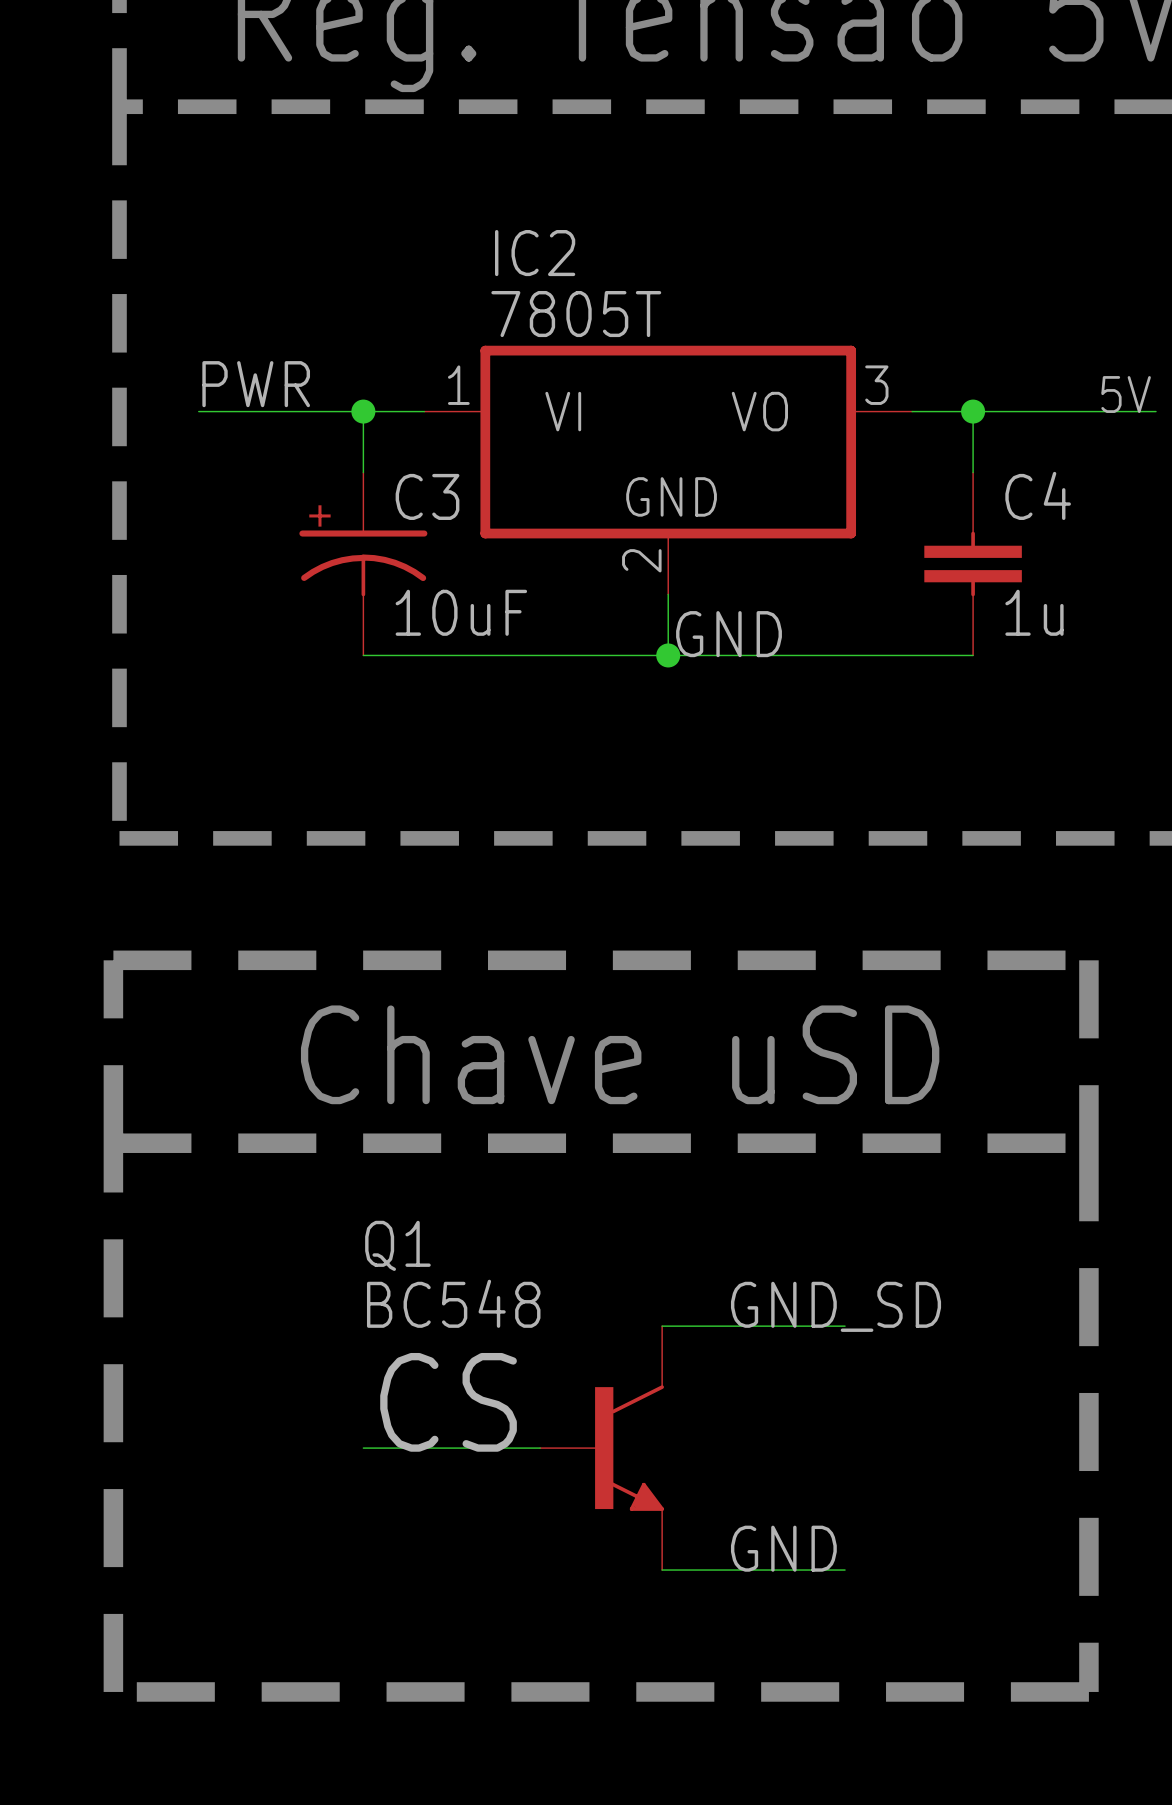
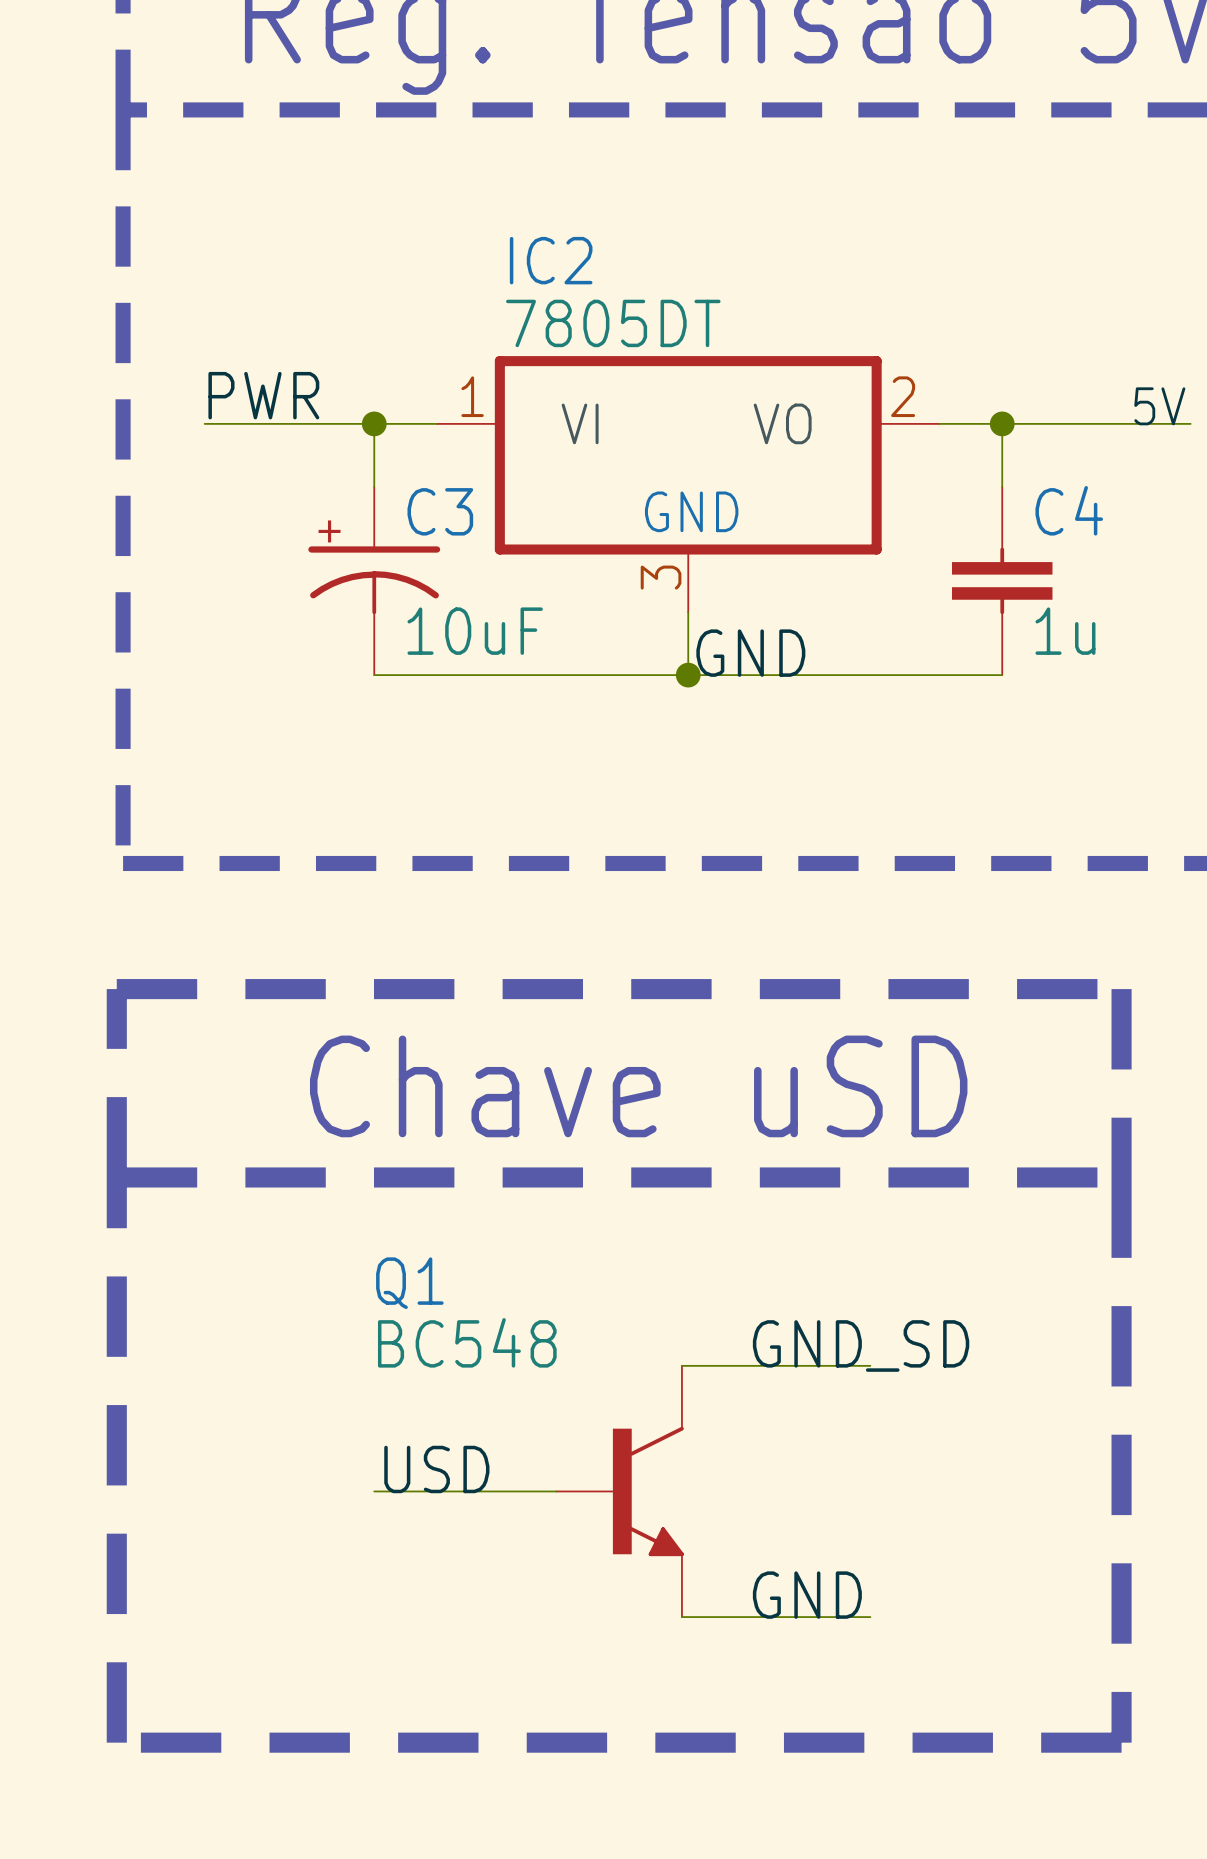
IC2 value: 7805T (576, 314) -> 7805DT (613, 323)
IC2 pin number: 3 (876, 385) -> 2 (903, 396)
IC2 pin number: 2 (641, 560) -> 3 (661, 577)
label: CS (448, 1402) -> USD (436, 1469)

